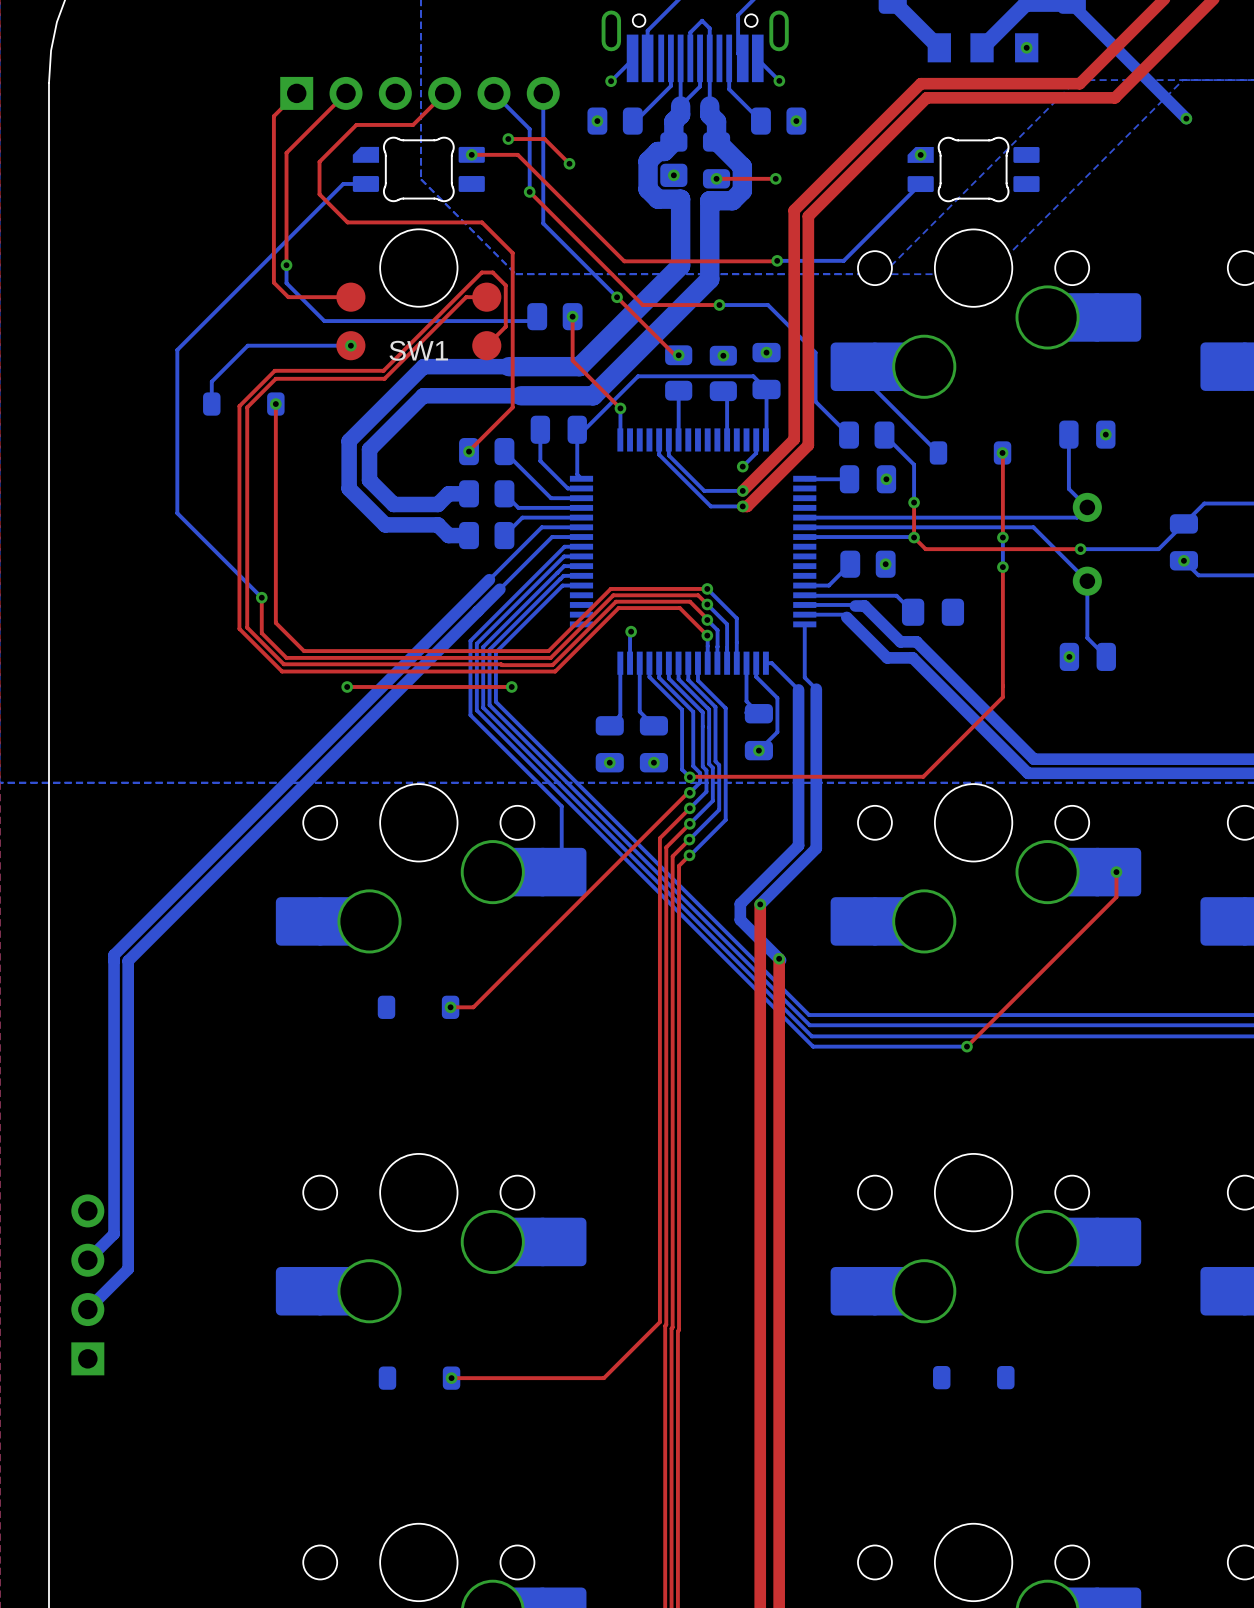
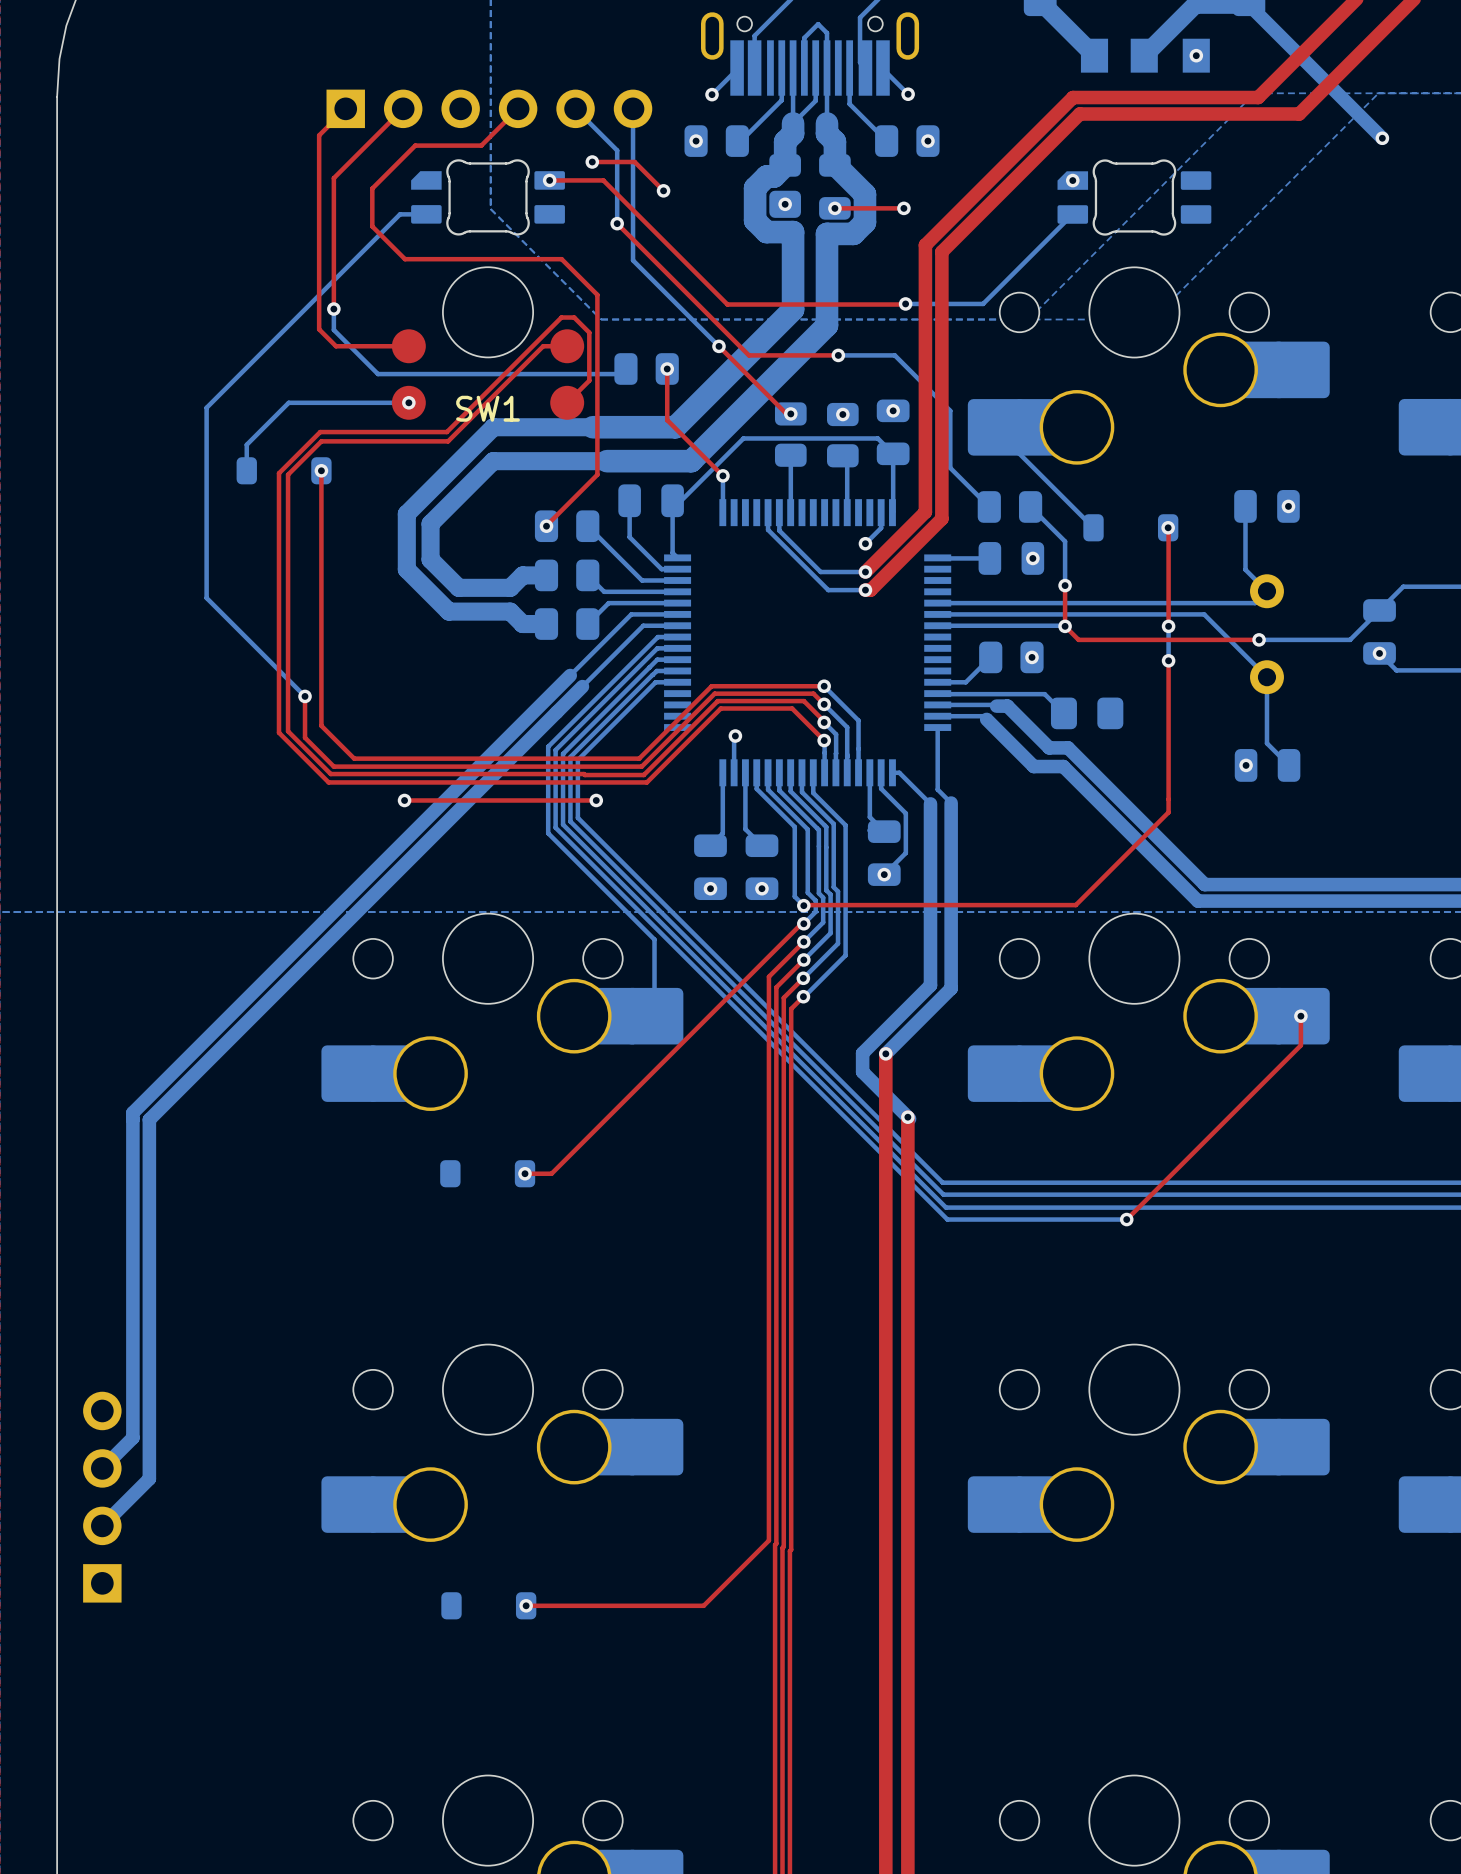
part: (973, 1377) -> none

